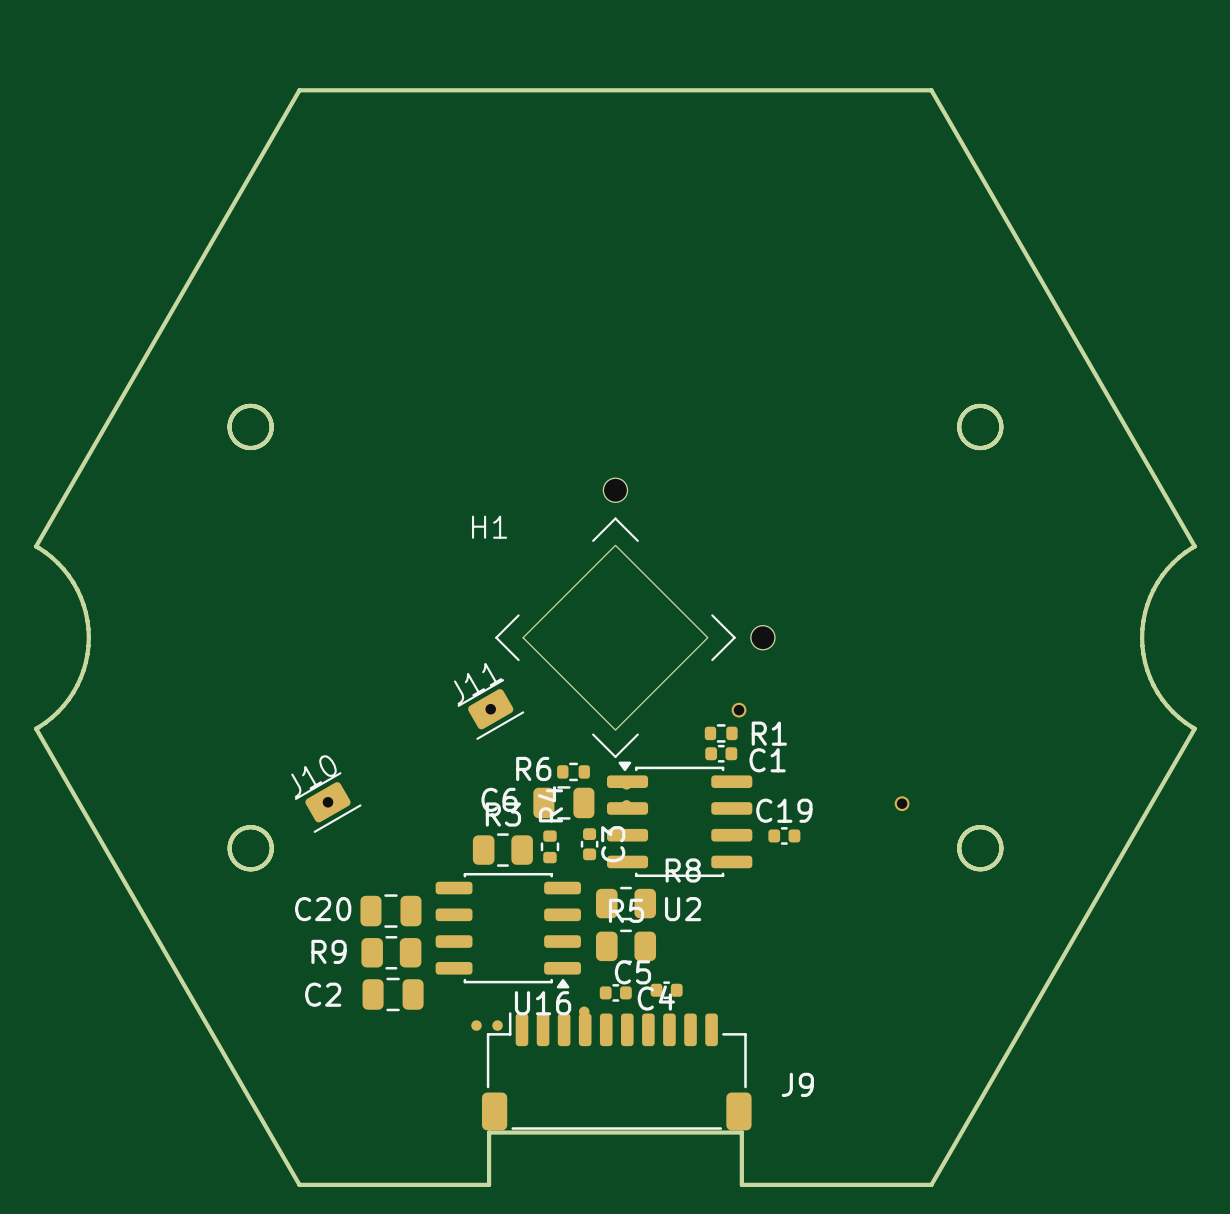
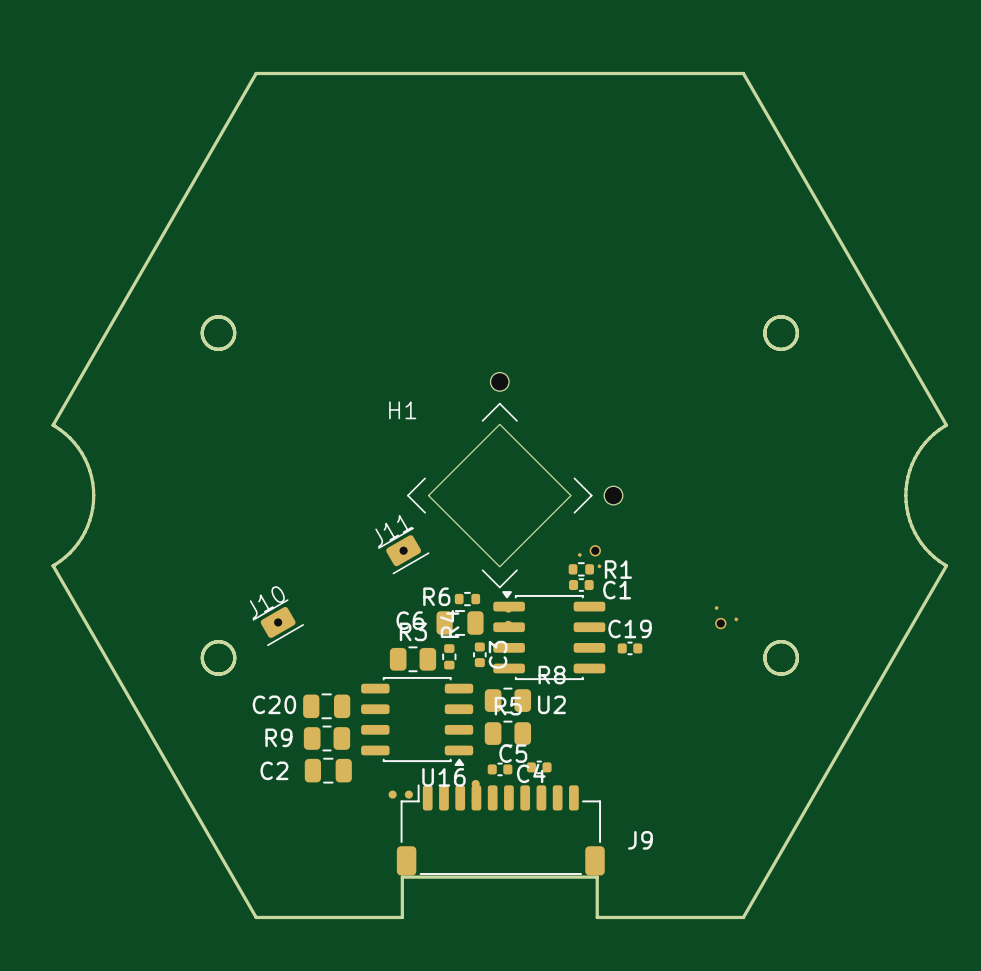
part footprint: [731, 702, 747, 718] -> [577, 545, 602, 569]
part footprint: [894, 796, 910, 812] -> [714, 605, 739, 630]

